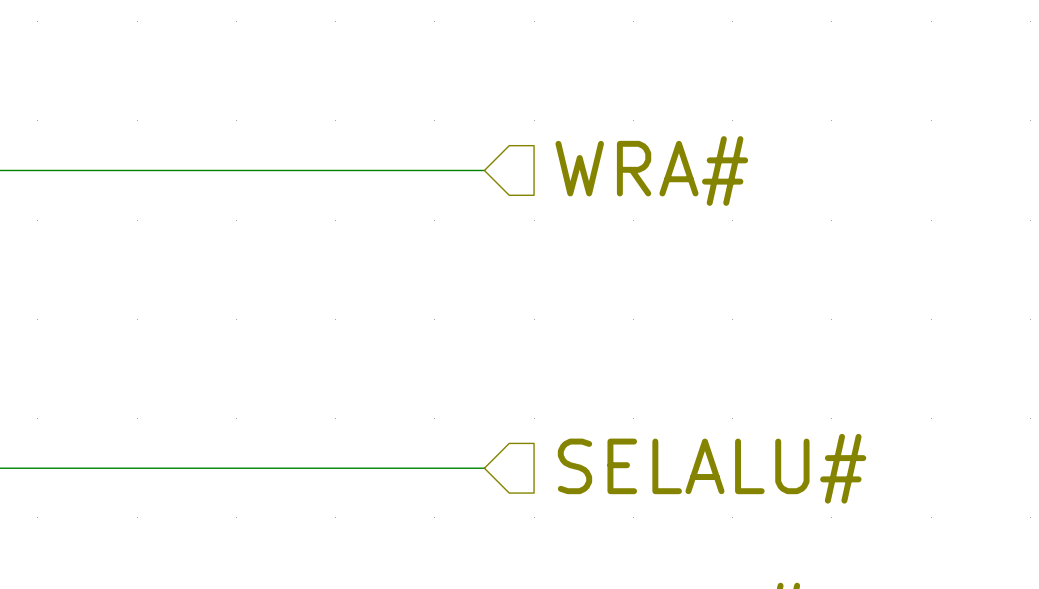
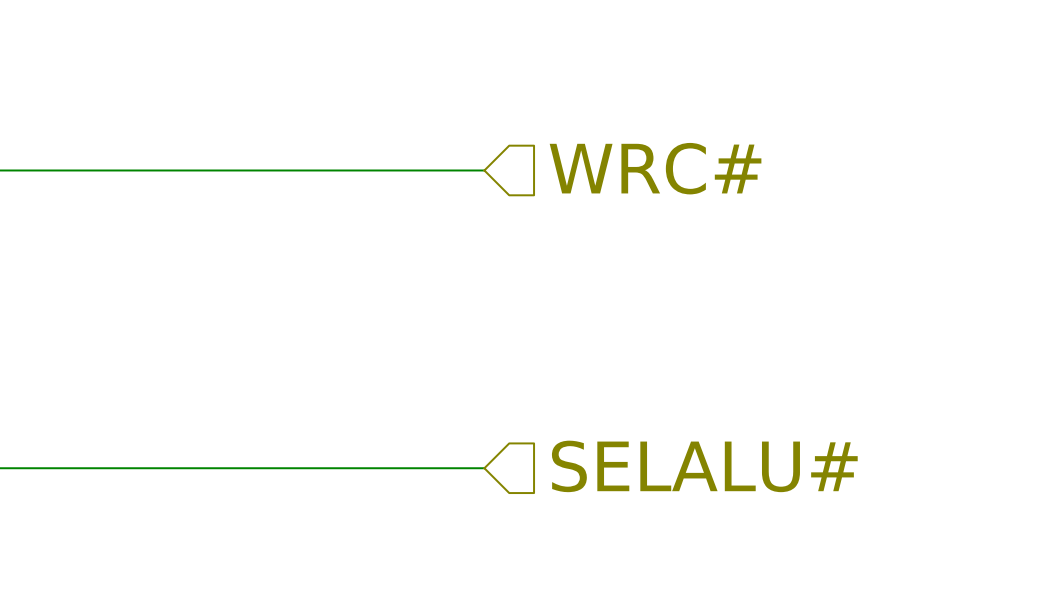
hierarchical label: WRA# (651, 170) -> WRC# (655, 168)

